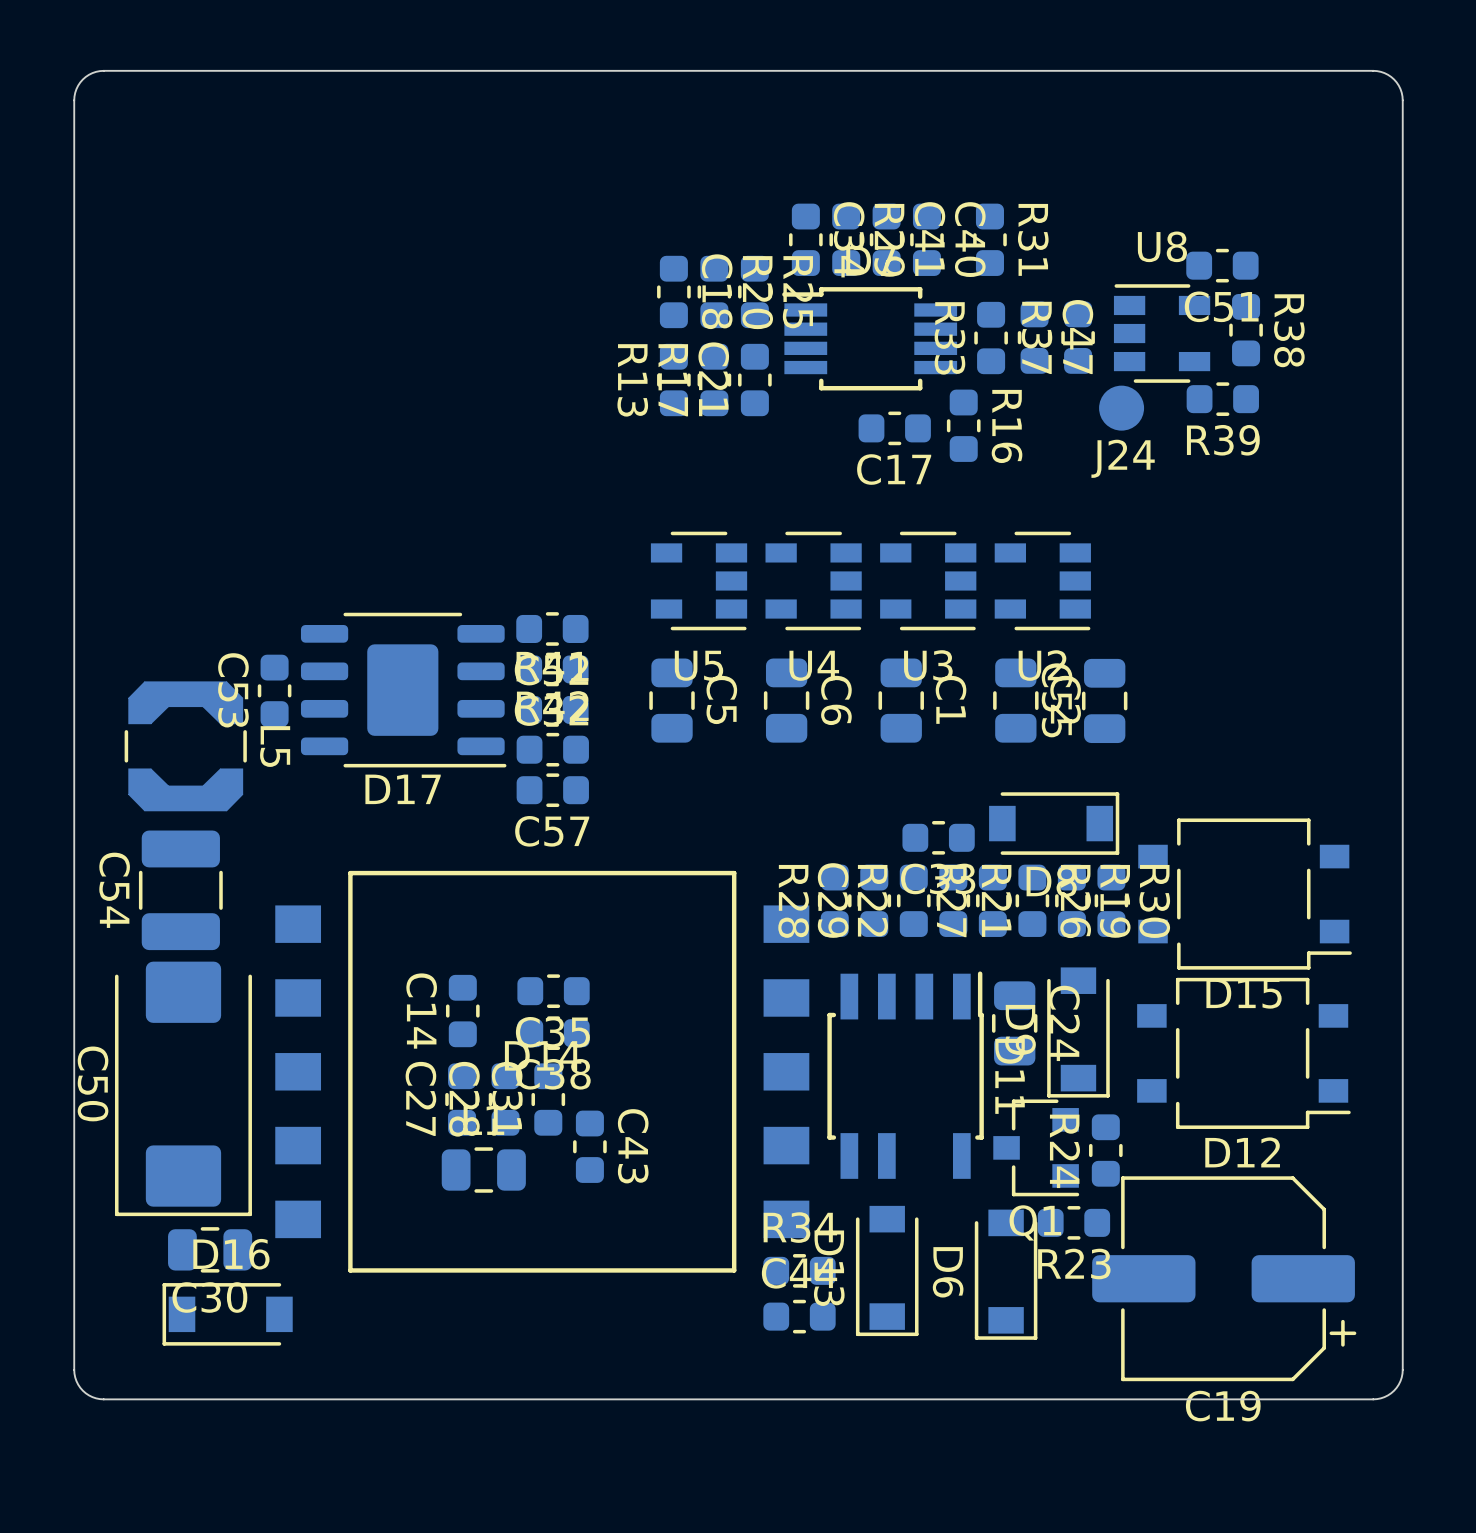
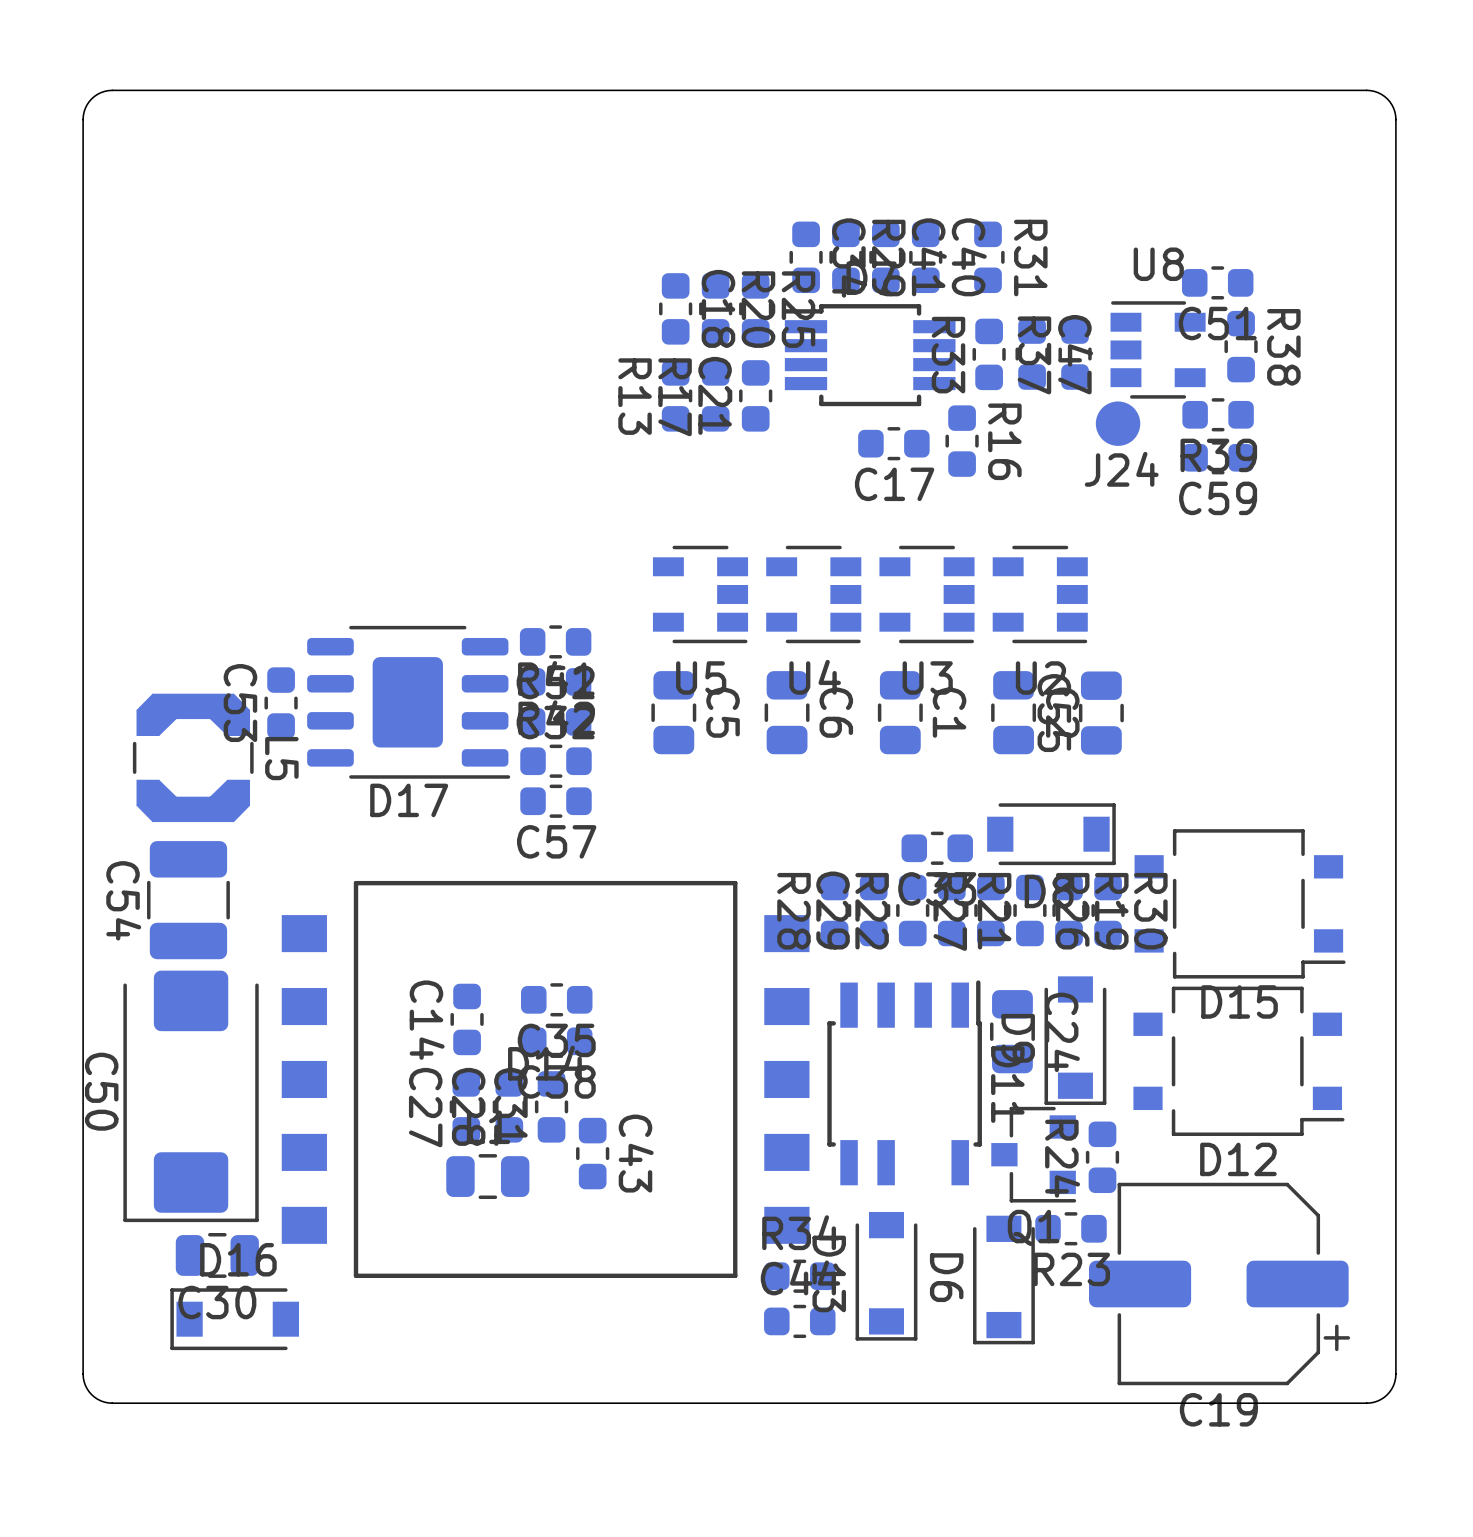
C59: none -> (1218, 457)

